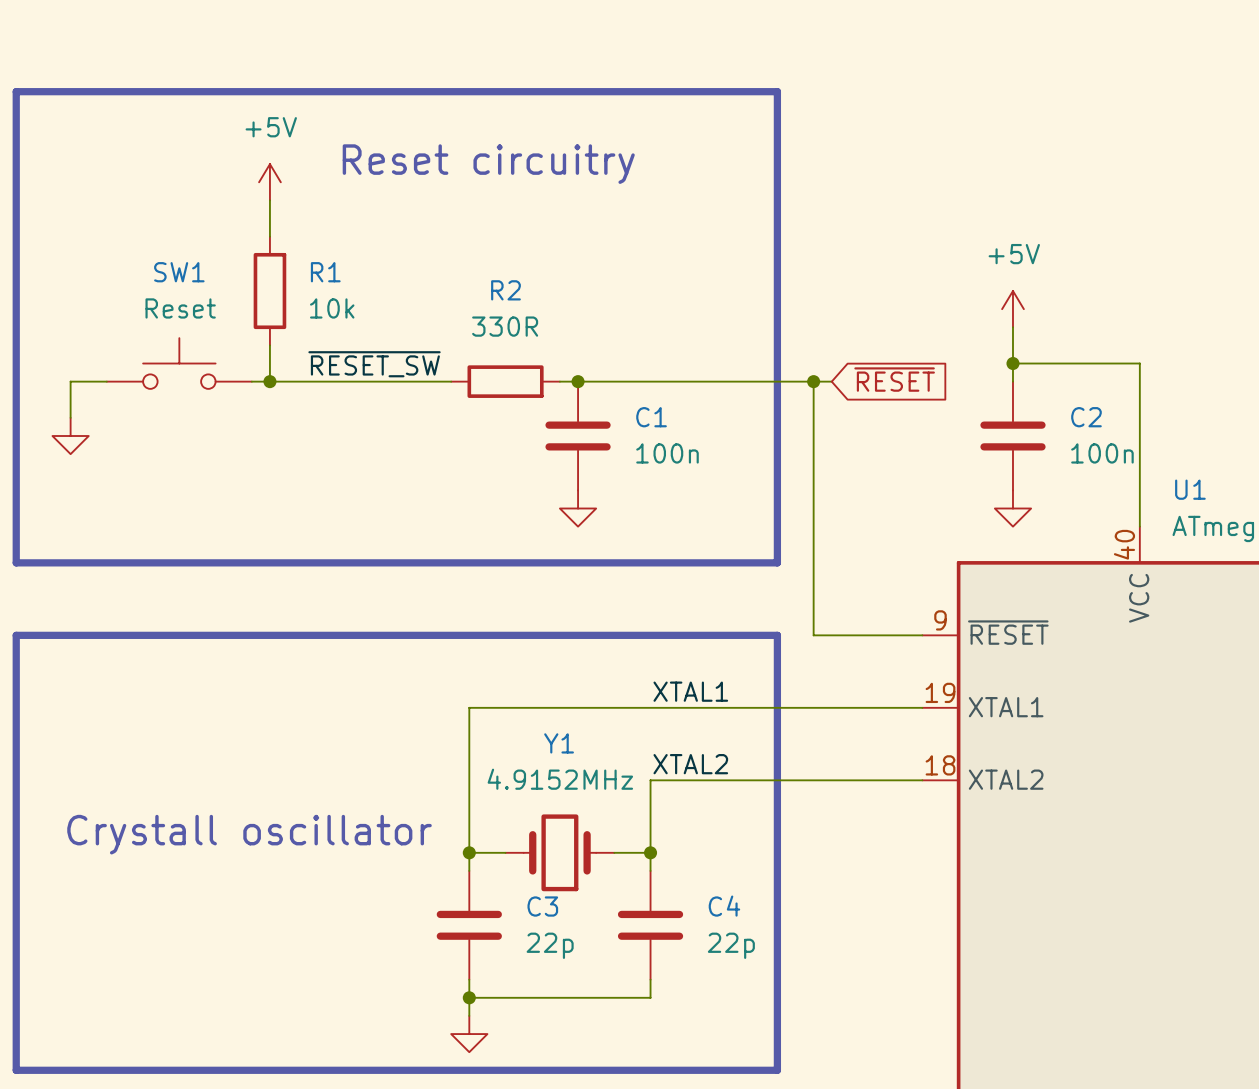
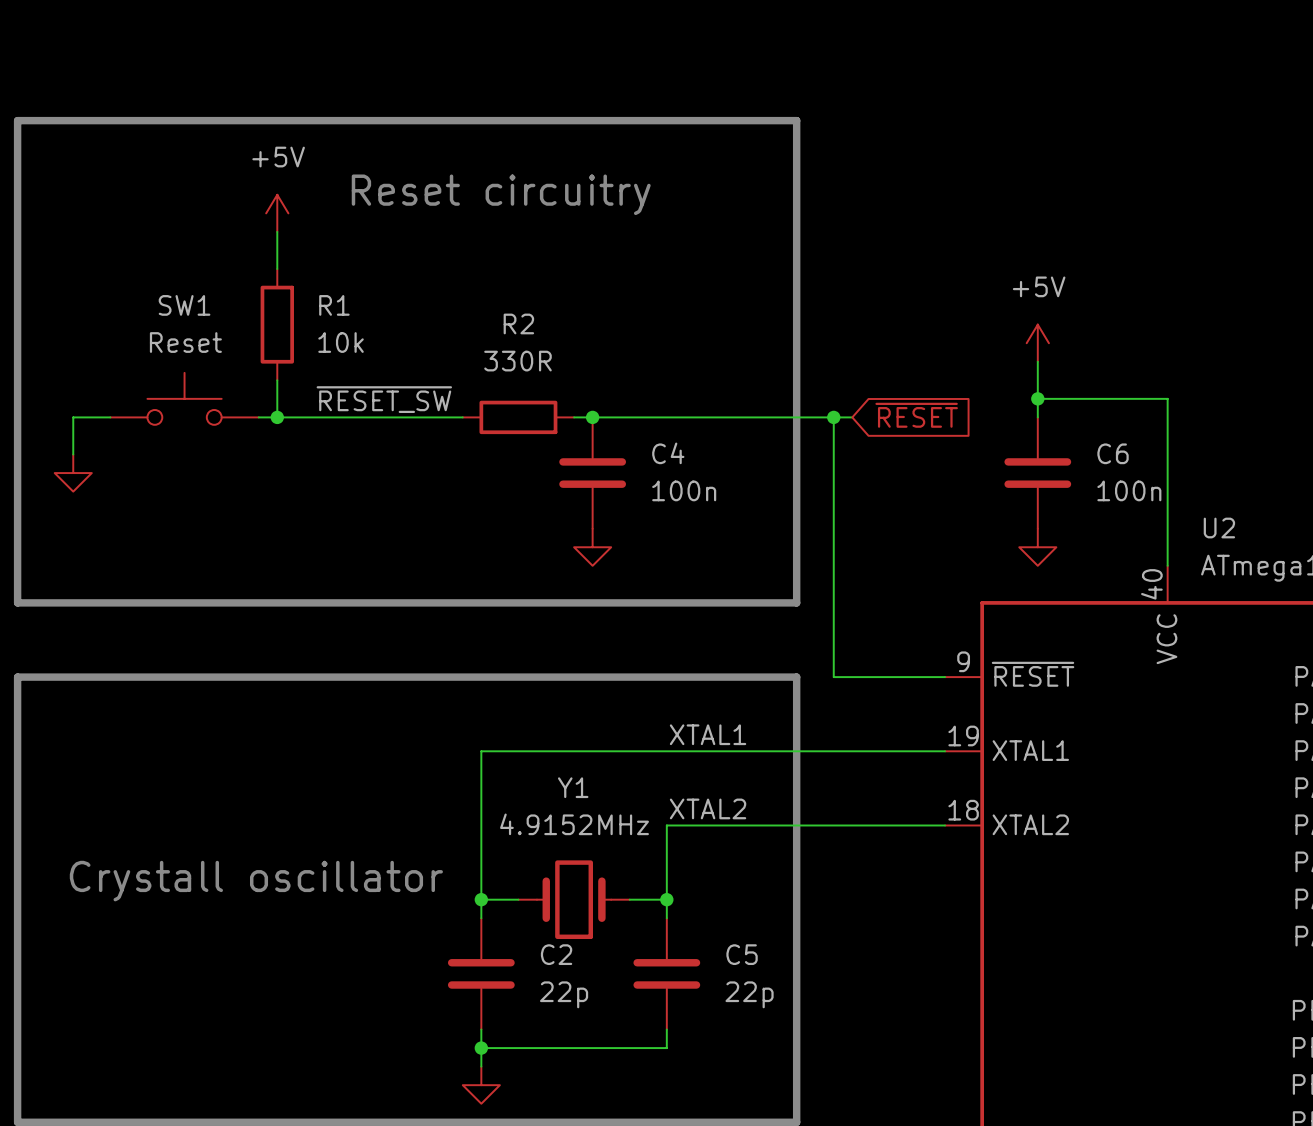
C1 name: C1 (651, 417) -> C4 (668, 453)
C2 name: C2 (1086, 417) -> C6 (1113, 453)
U1 name: U1 (1190, 489) -> U2 (1219, 528)
C3 name: C3 (542, 906) -> C2 (556, 954)
C4 name: C4 (724, 906) -> C5 (742, 954)

